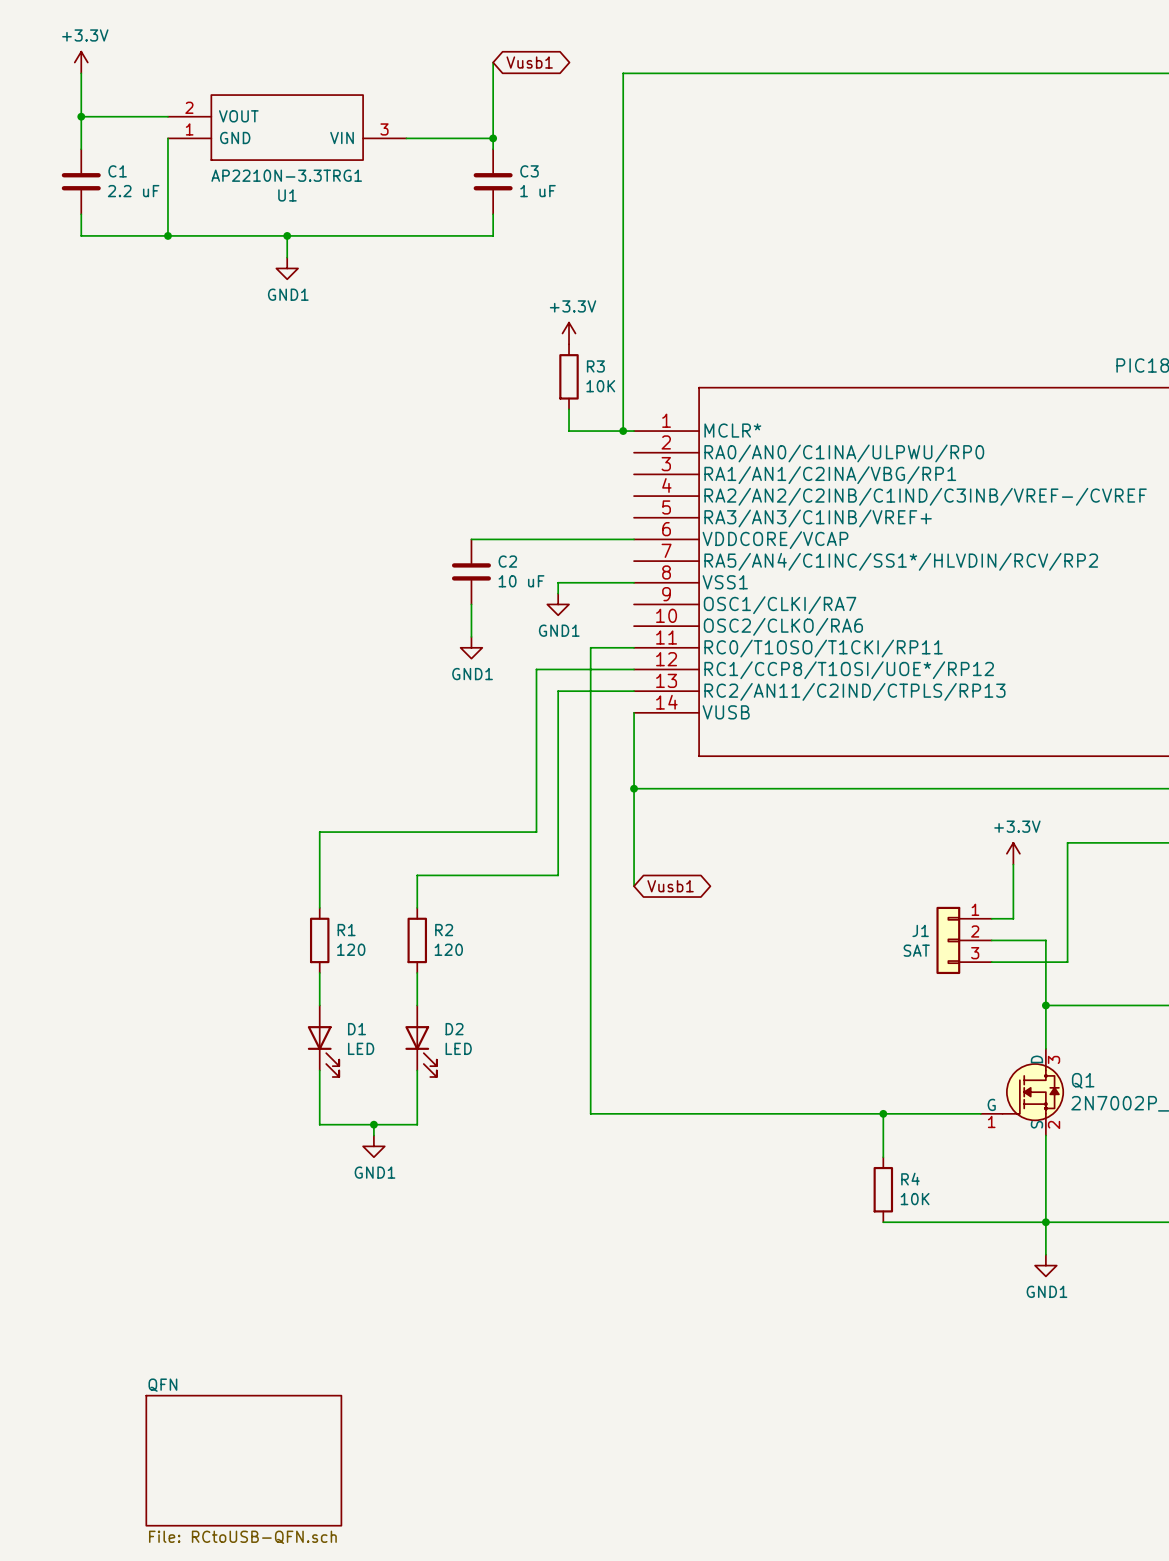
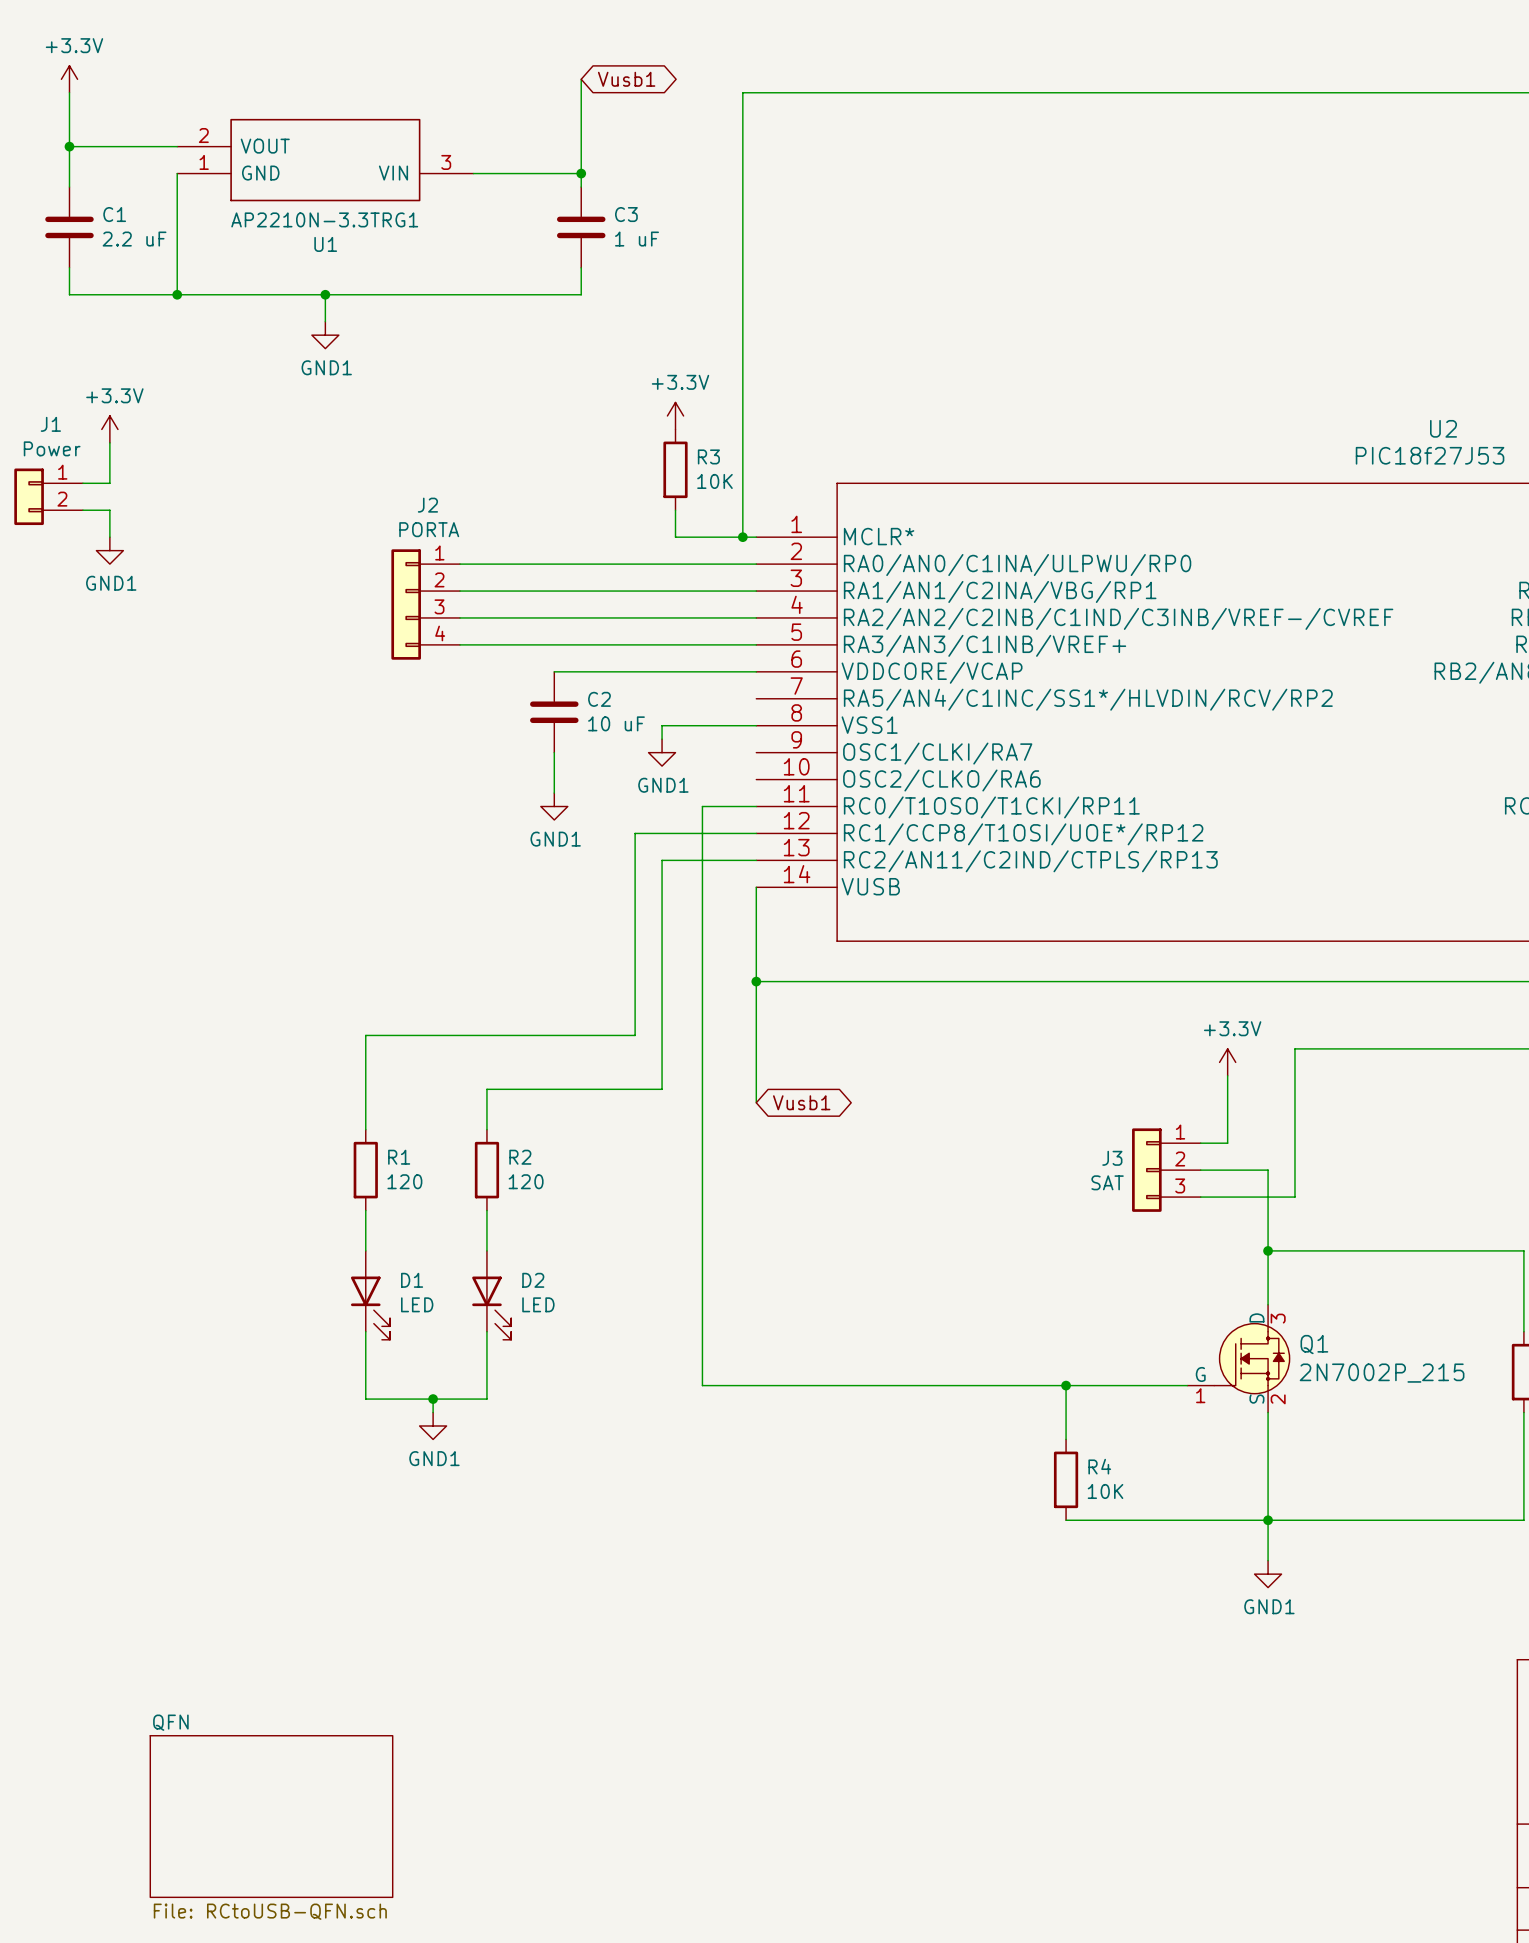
power symbol: none -> +3.3V (109, 429)
wire: none -> (109, 442) (109, 483) (82, 483)
J1: none -> Power (48, 496)
wire: none -> (82, 510) (109, 510) (109, 537)
power symbol: none -> GND1 (109, 550)
wire: none -> (460, 564) (756, 564)
wire: none -> (460, 591) (756, 591)
J2: none -> PORTA (425, 604)
wire: none -> (460, 617) (756, 617)
wire: none -> (460, 644) (756, 644)
J1 name: J1 (920, 930) -> J3 (1112, 1158)

